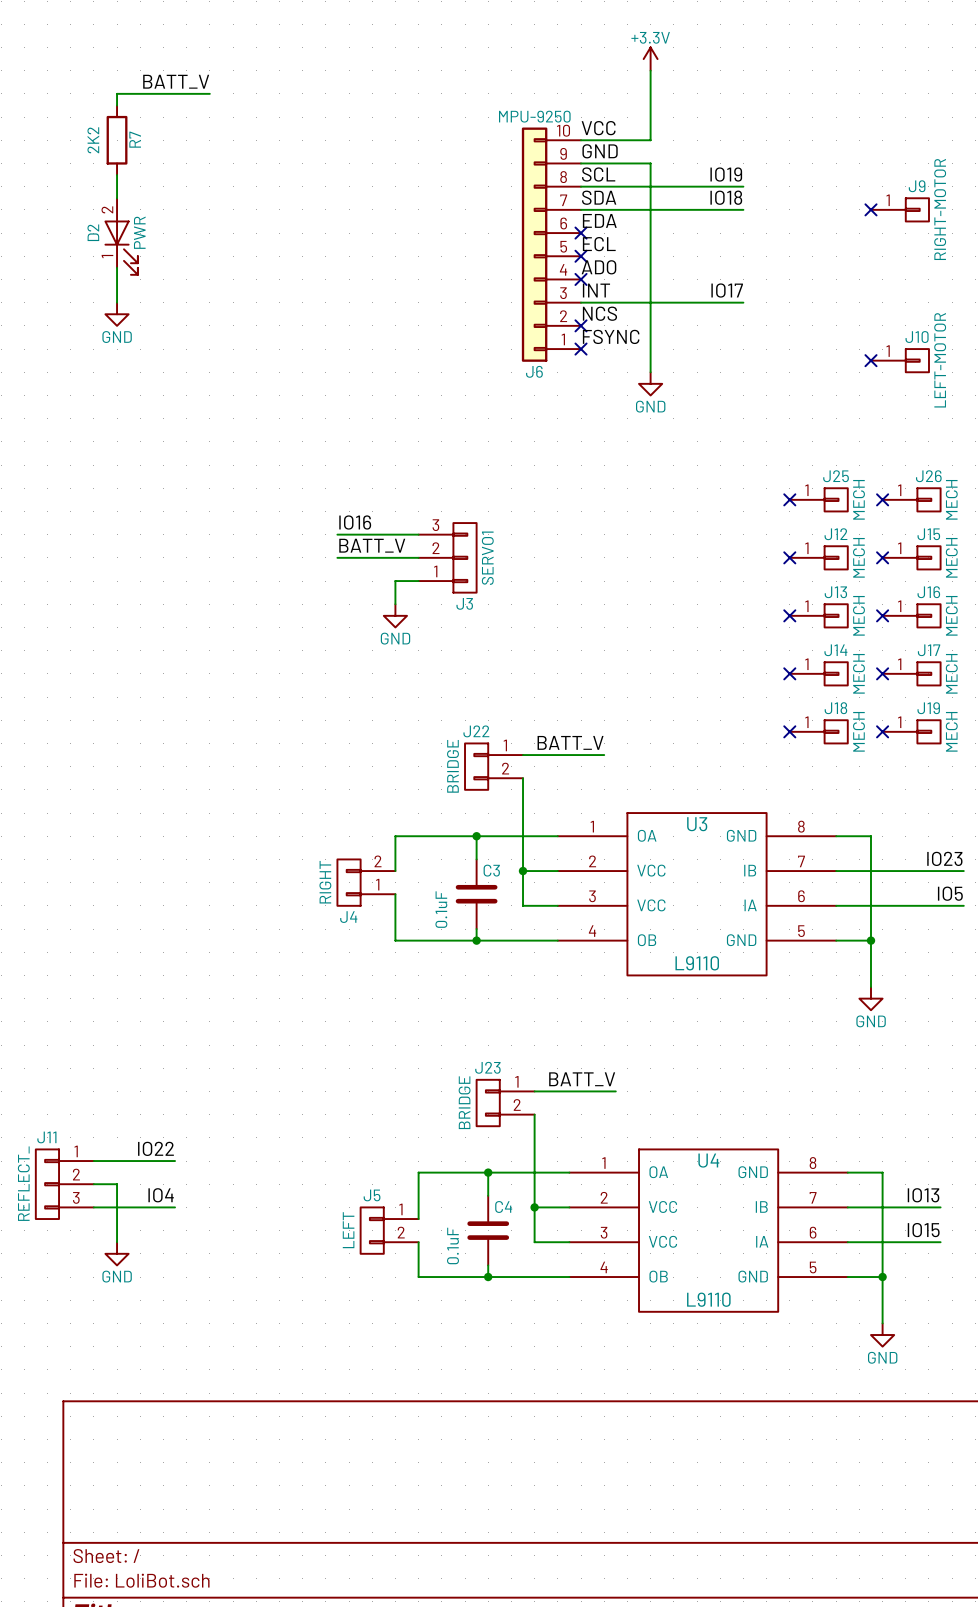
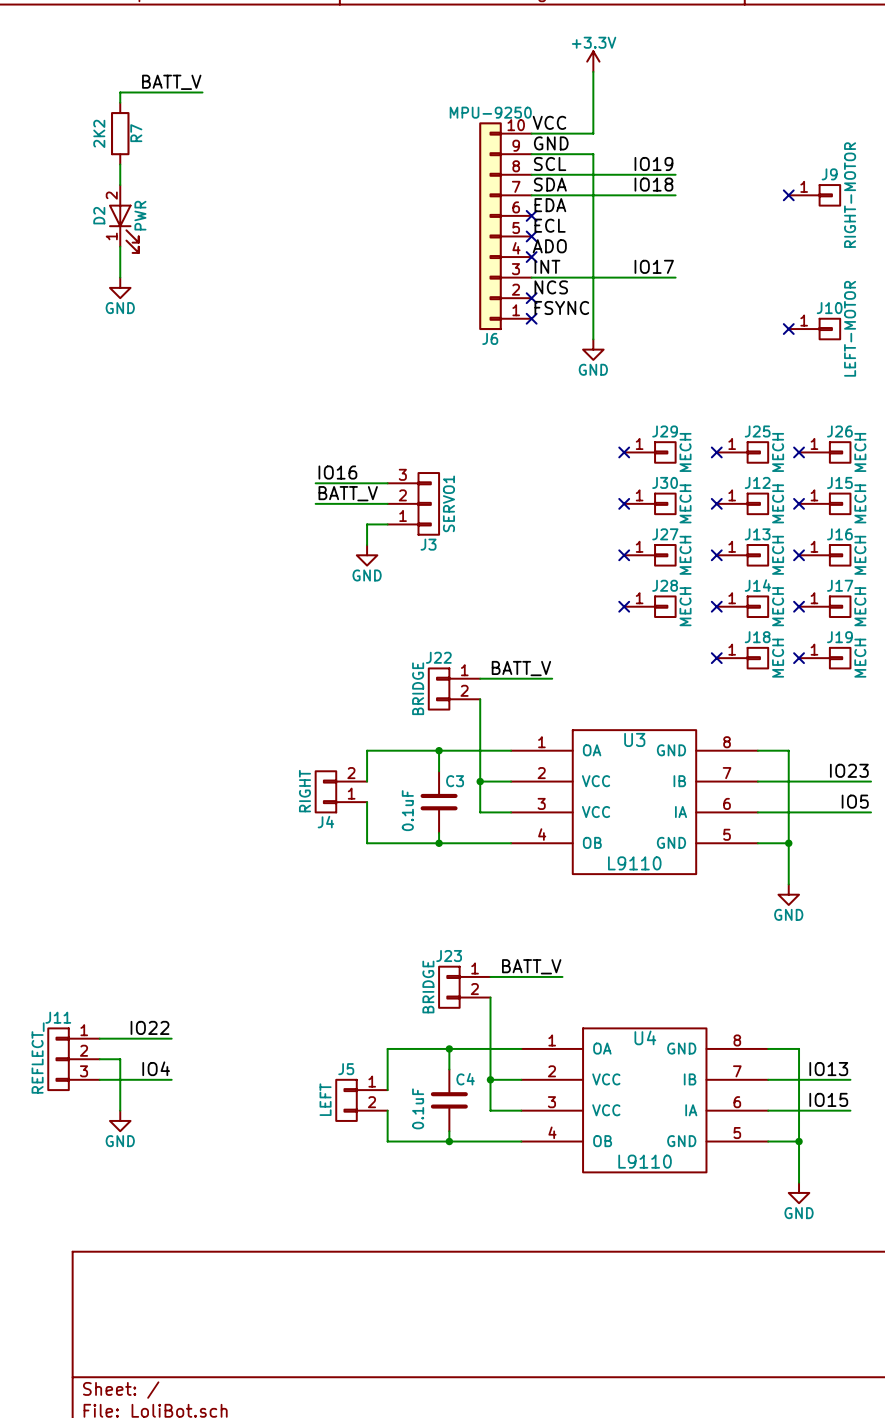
no-connect mark: none -> (624, 452)
J29: none -> MECH (649, 452)
no-connect mark: none -> (624, 503)
J30: none -> MECH (649, 503)
no-connect mark: none -> (624, 555)
J27: none -> MECH (649, 555)
no-connect mark: none -> (624, 606)
J28: none -> MECH (649, 606)

